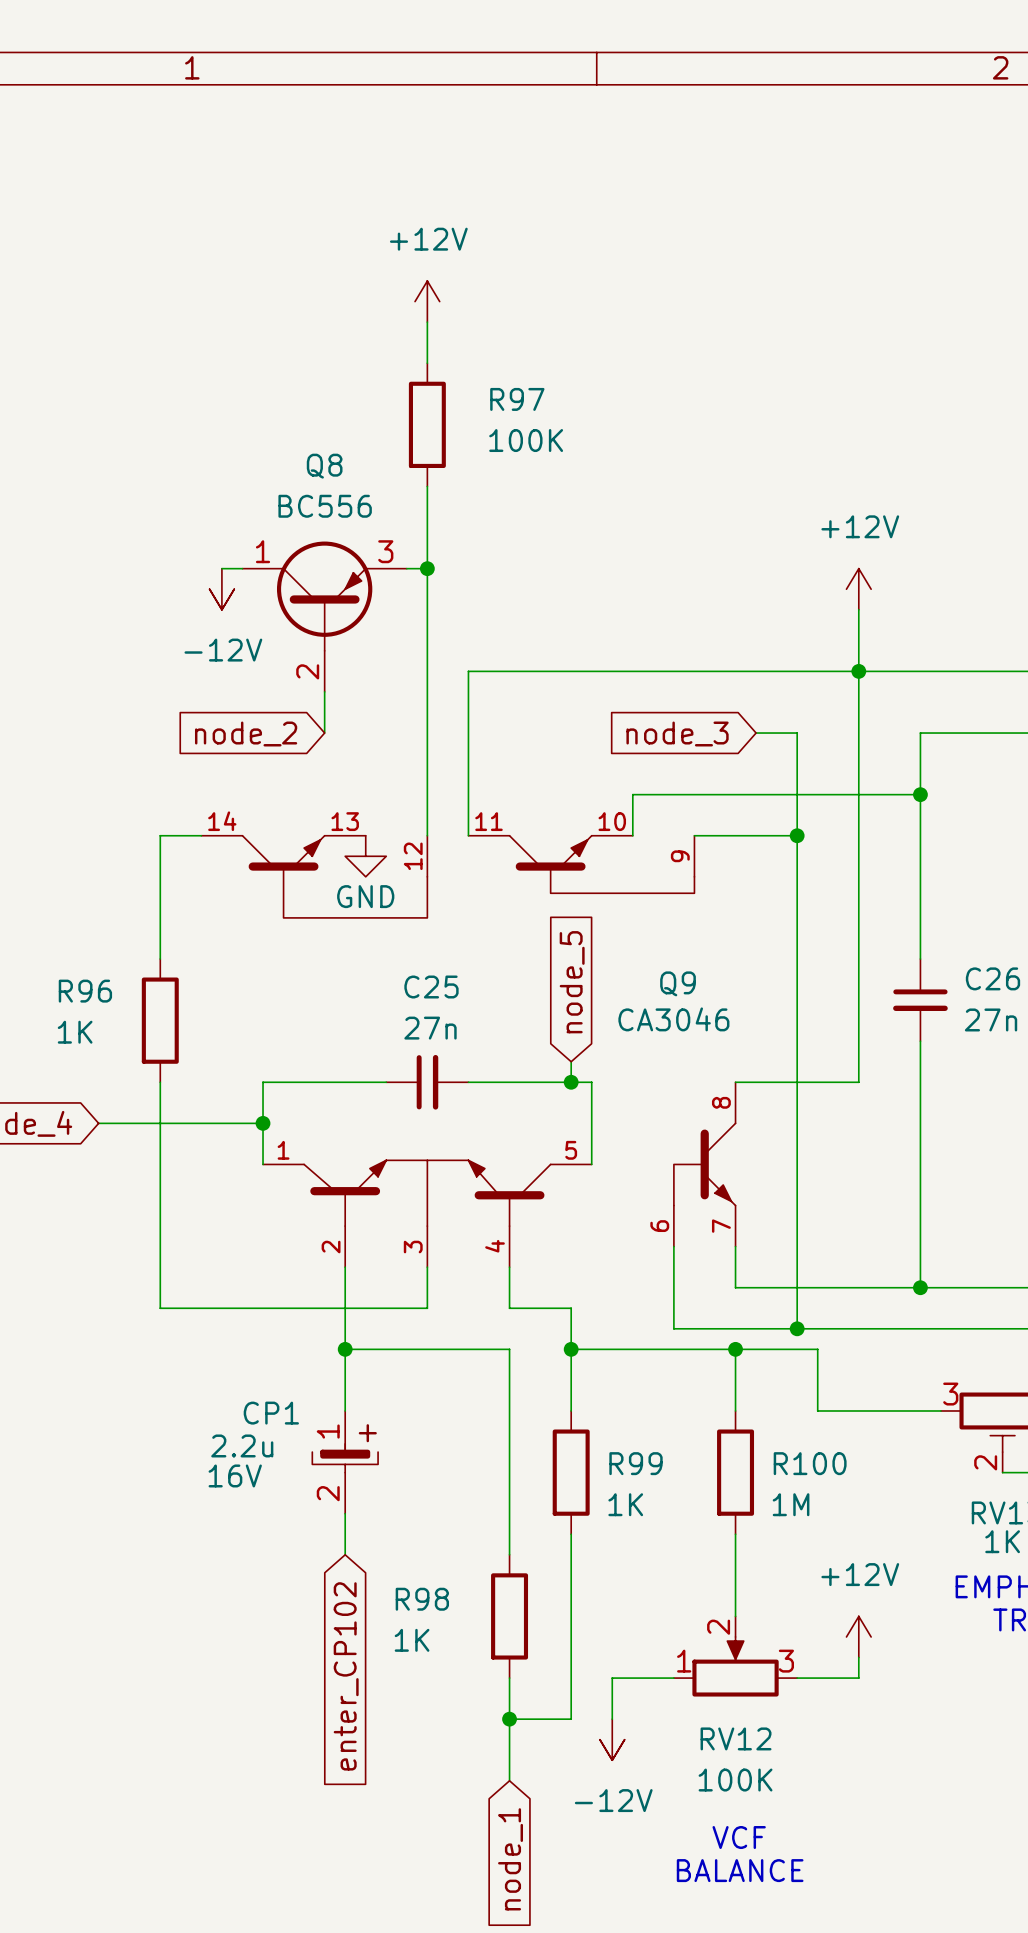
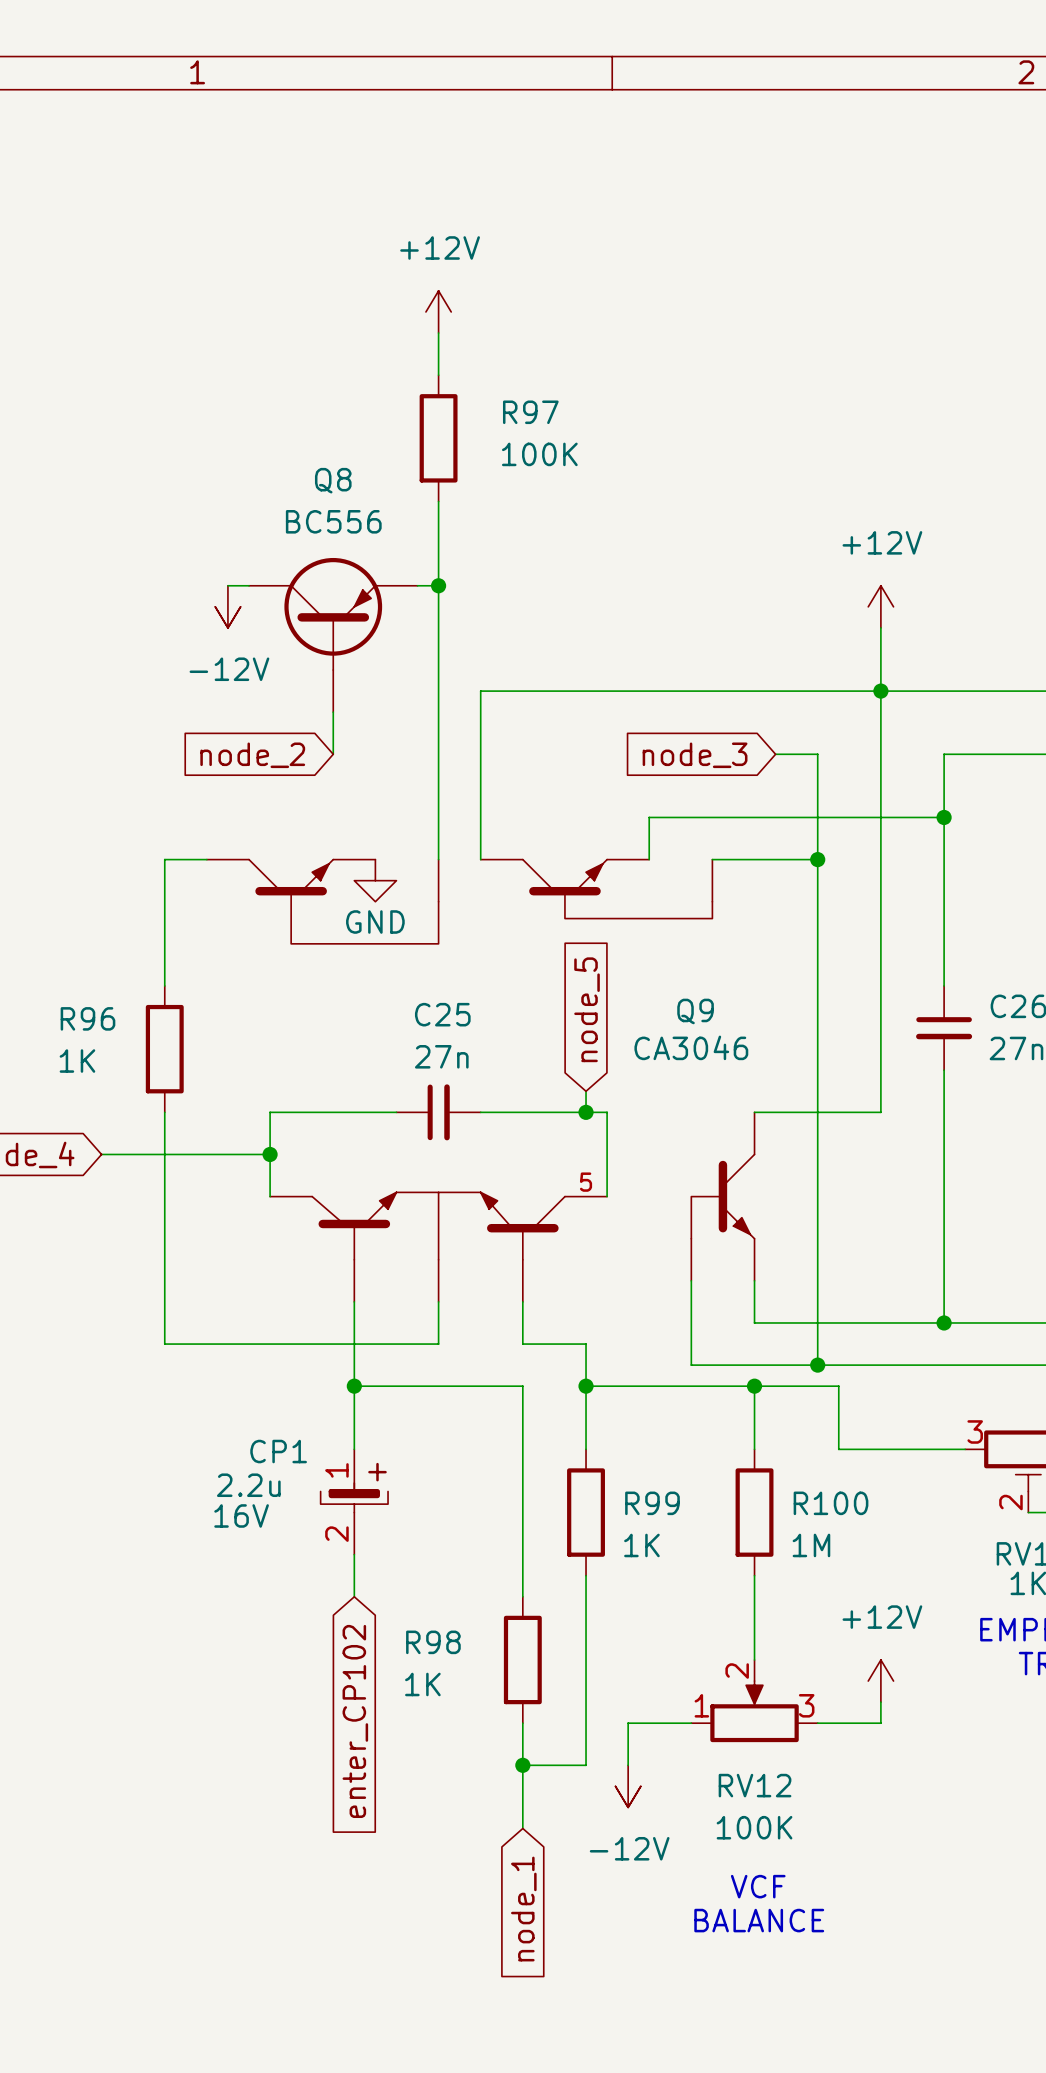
Q8 pin number: 1 (263, 551) -> none
Q8 pin number: 3 (385, 551) -> none
Q8 pin number: 2 (307, 671) -> none
Q9 symbol: [201, 835, 736, 1268] -> [206, 859, 755, 1302]

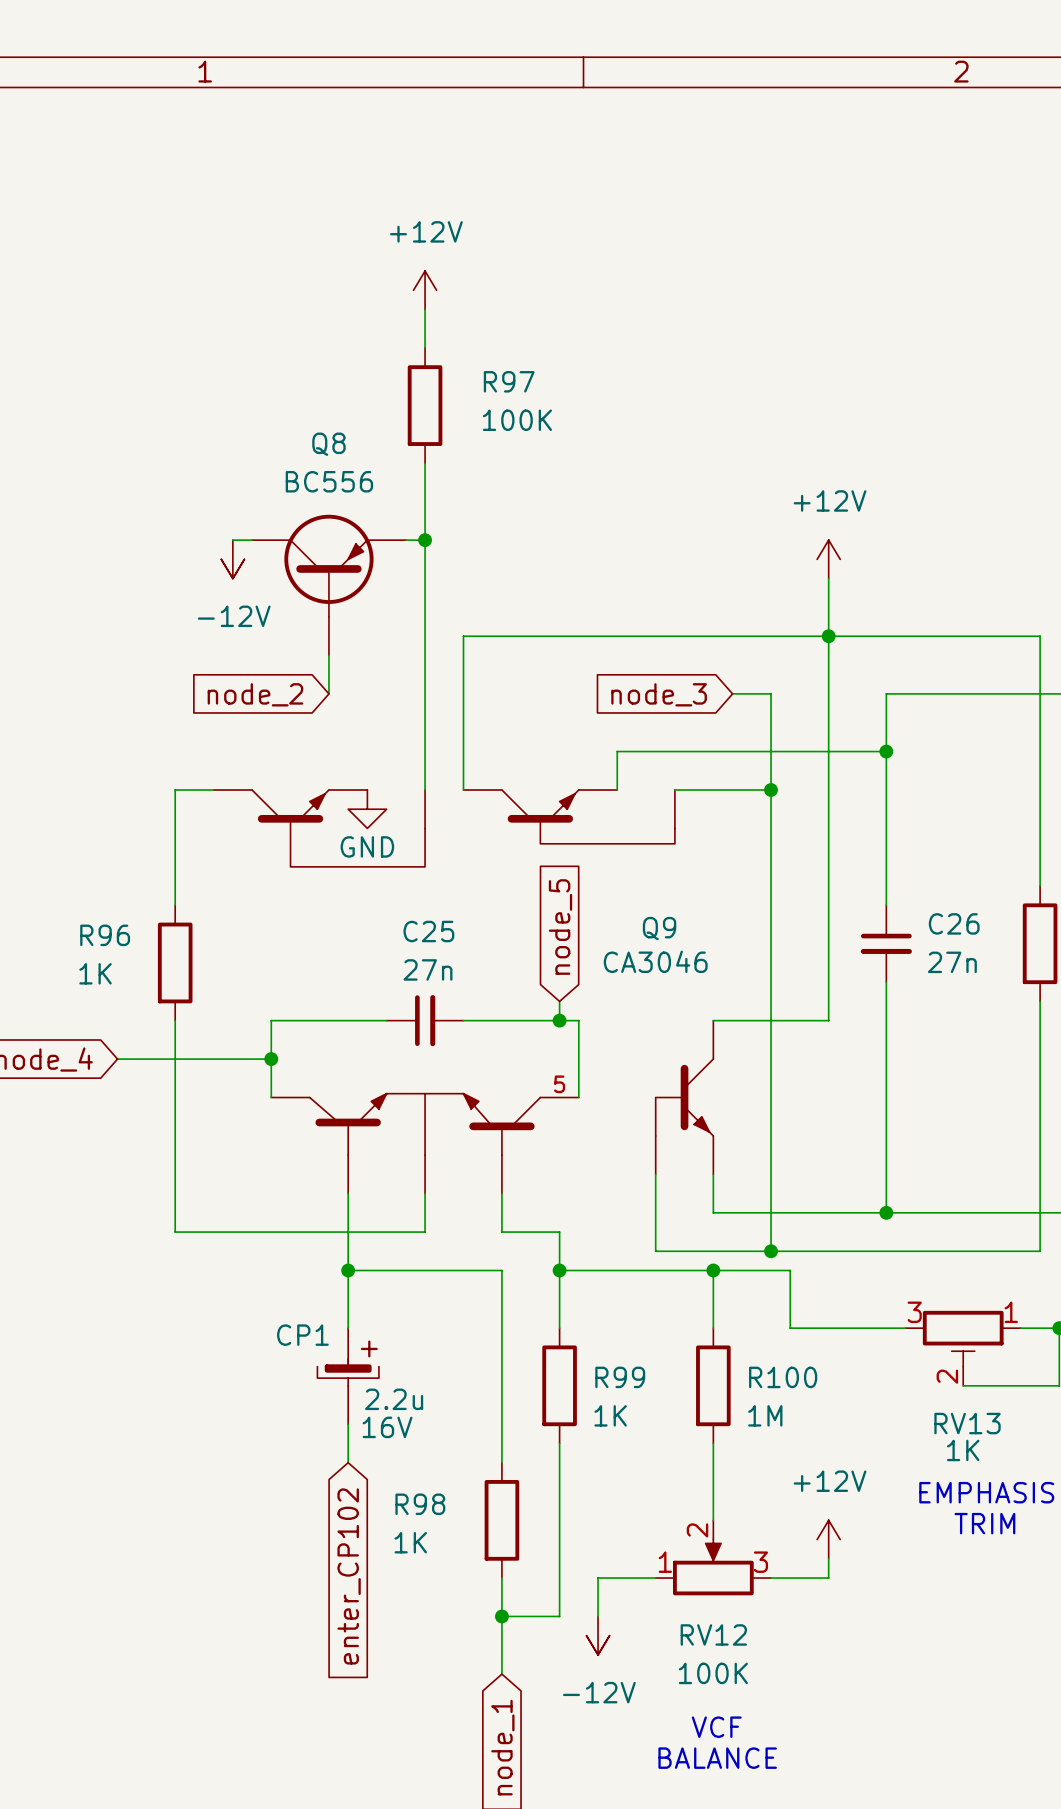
CP1 symbol: [307, 1449, 389, 1555] -> [305, 1328, 379, 1425]
CP1 value position: 2.2u (248, 1485) -> 2.2u (394, 1399)
CP1 text position: 16V (241, 1515) -> 16V (387, 1427)

